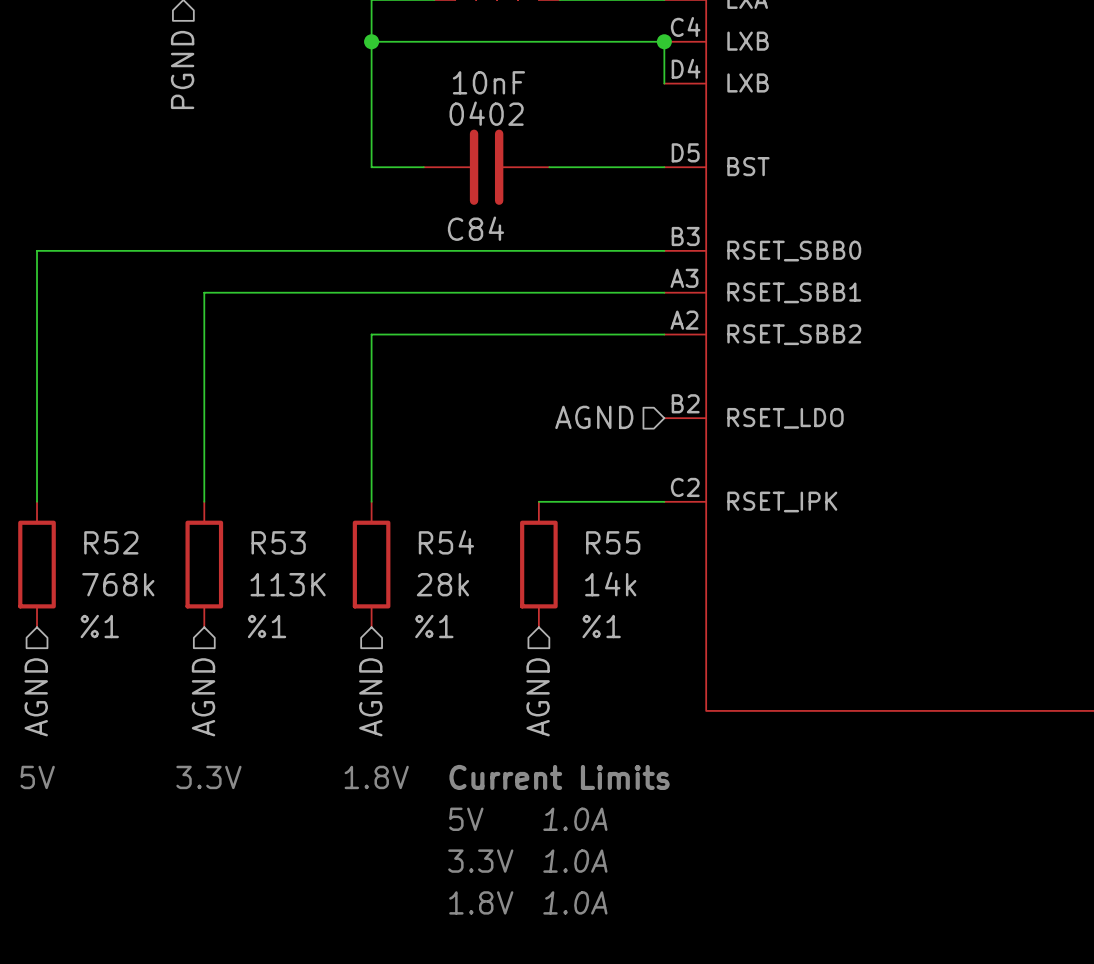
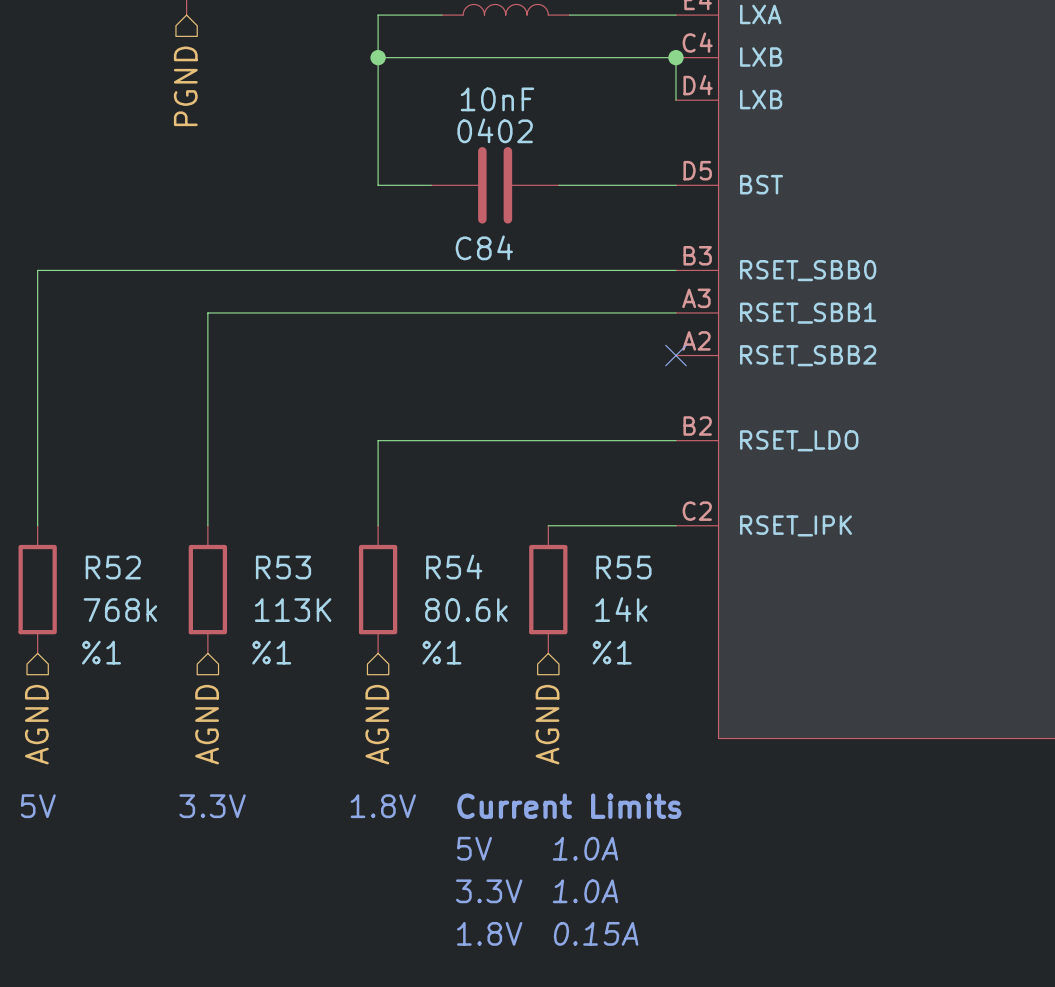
wire: (664, 334) (371, 334) (371, 418) -> (675, 440) (378, 440)
no-connect mark: none -> (675, 355)
hierarchical label: AGND (594, 417) -> none
R54 value: 28k (442, 584) -> 80.6k (466, 610)
text: 1.0A (575, 902) -> 0.15A (596, 933)

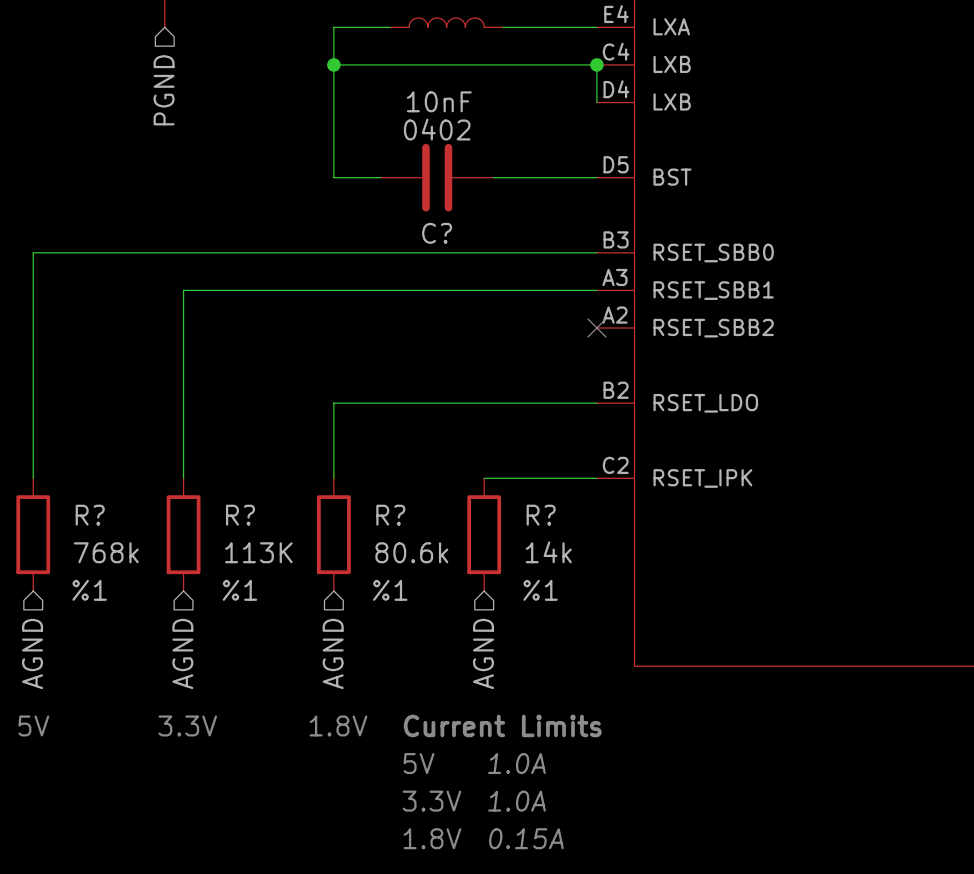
C84 name: C84 (484, 247) -> C? (437, 233)
R52 name: R52 (113, 567) -> R? (90, 515)
R53 name: R53 (283, 567) -> R? (240, 515)
R54 name: R54 (454, 567) -> R? (390, 515)
R55 name: R55 (623, 567) -> R? (541, 515)

